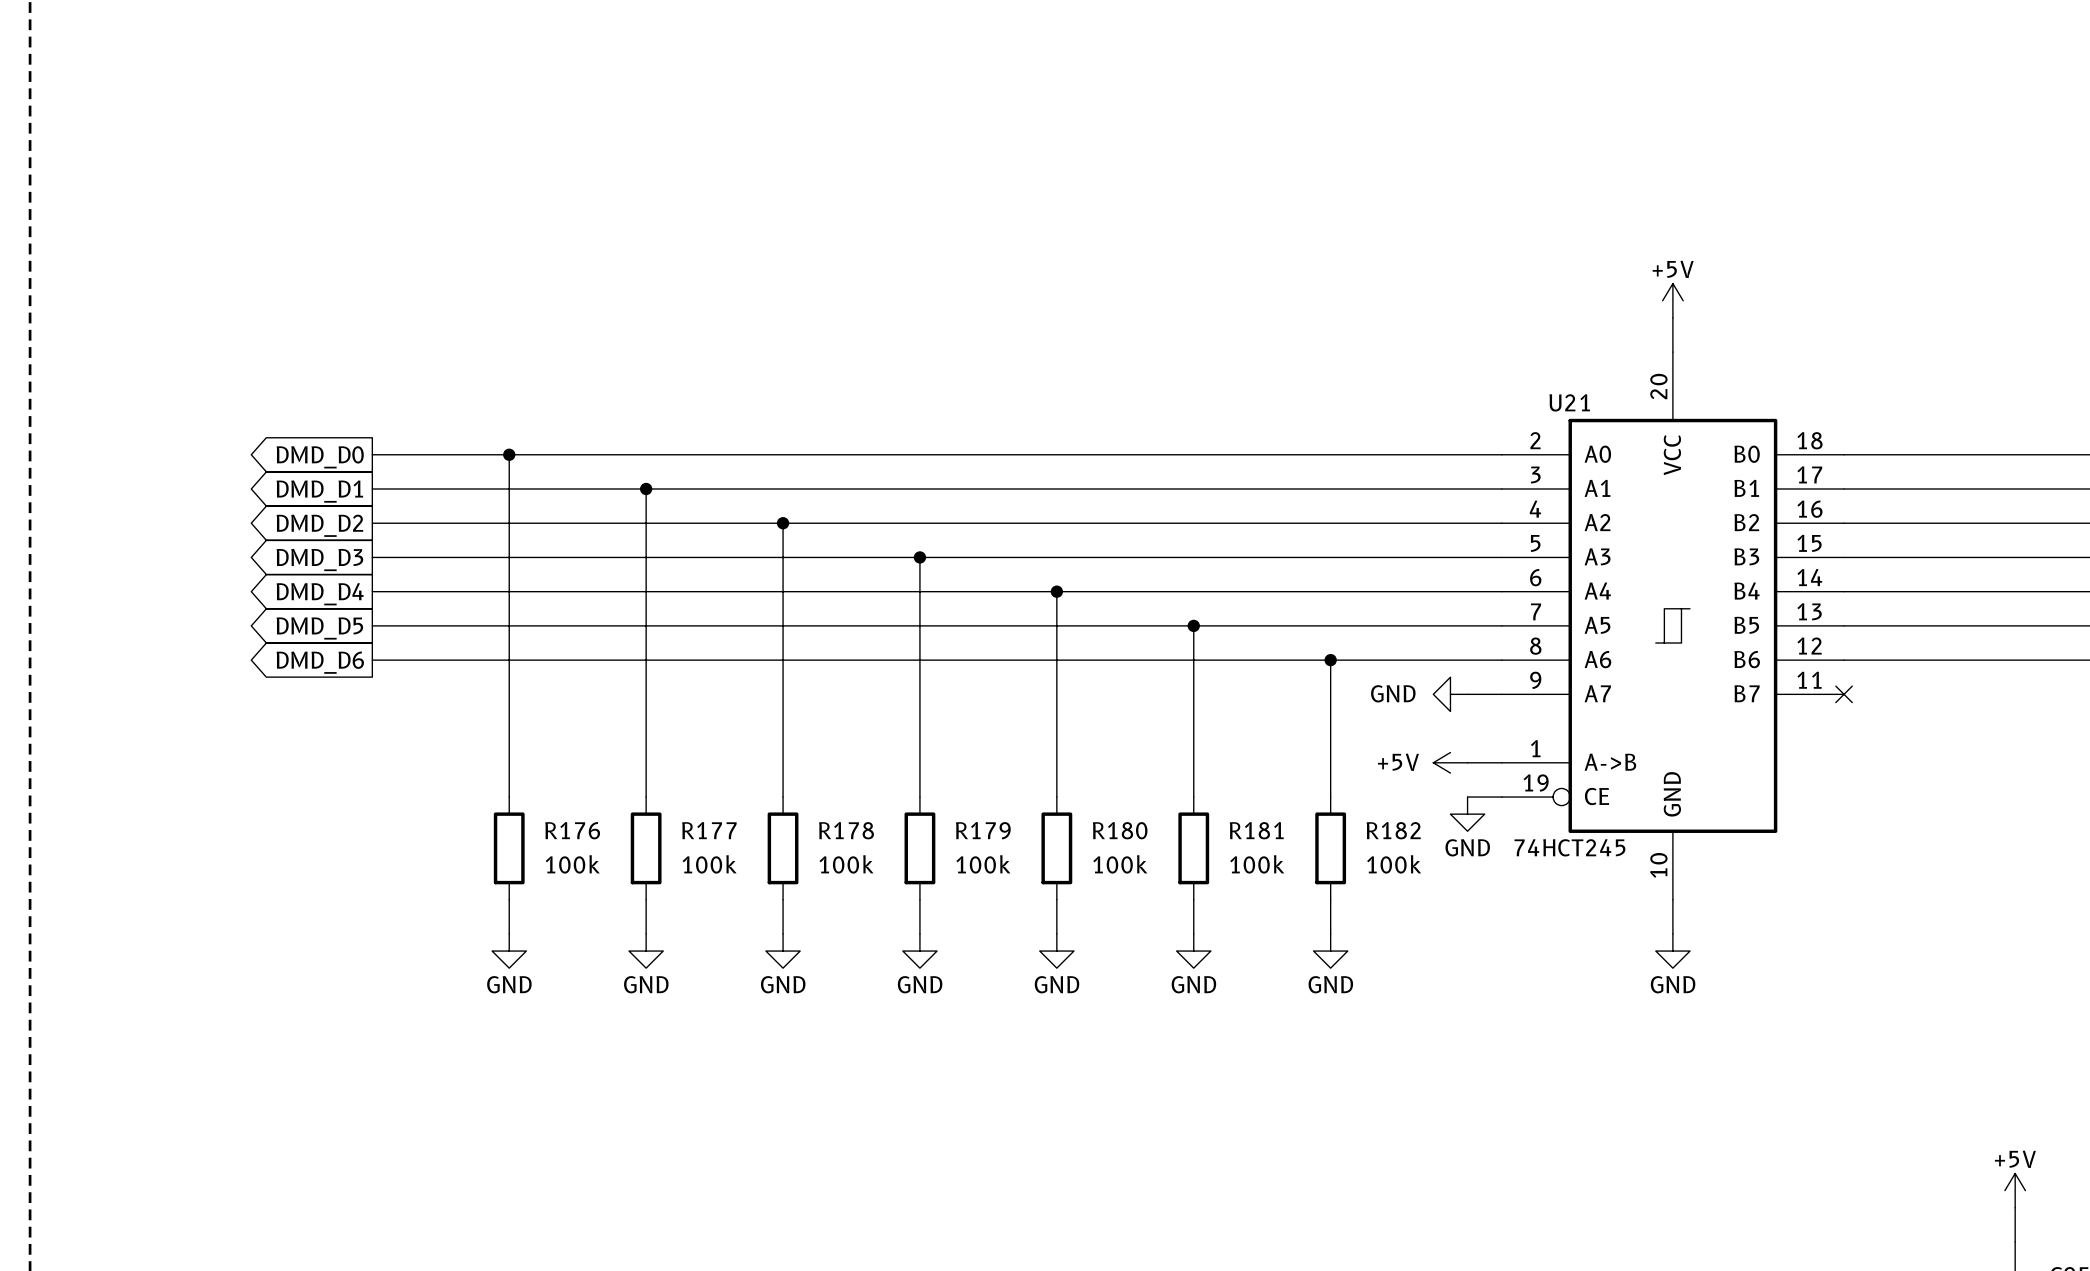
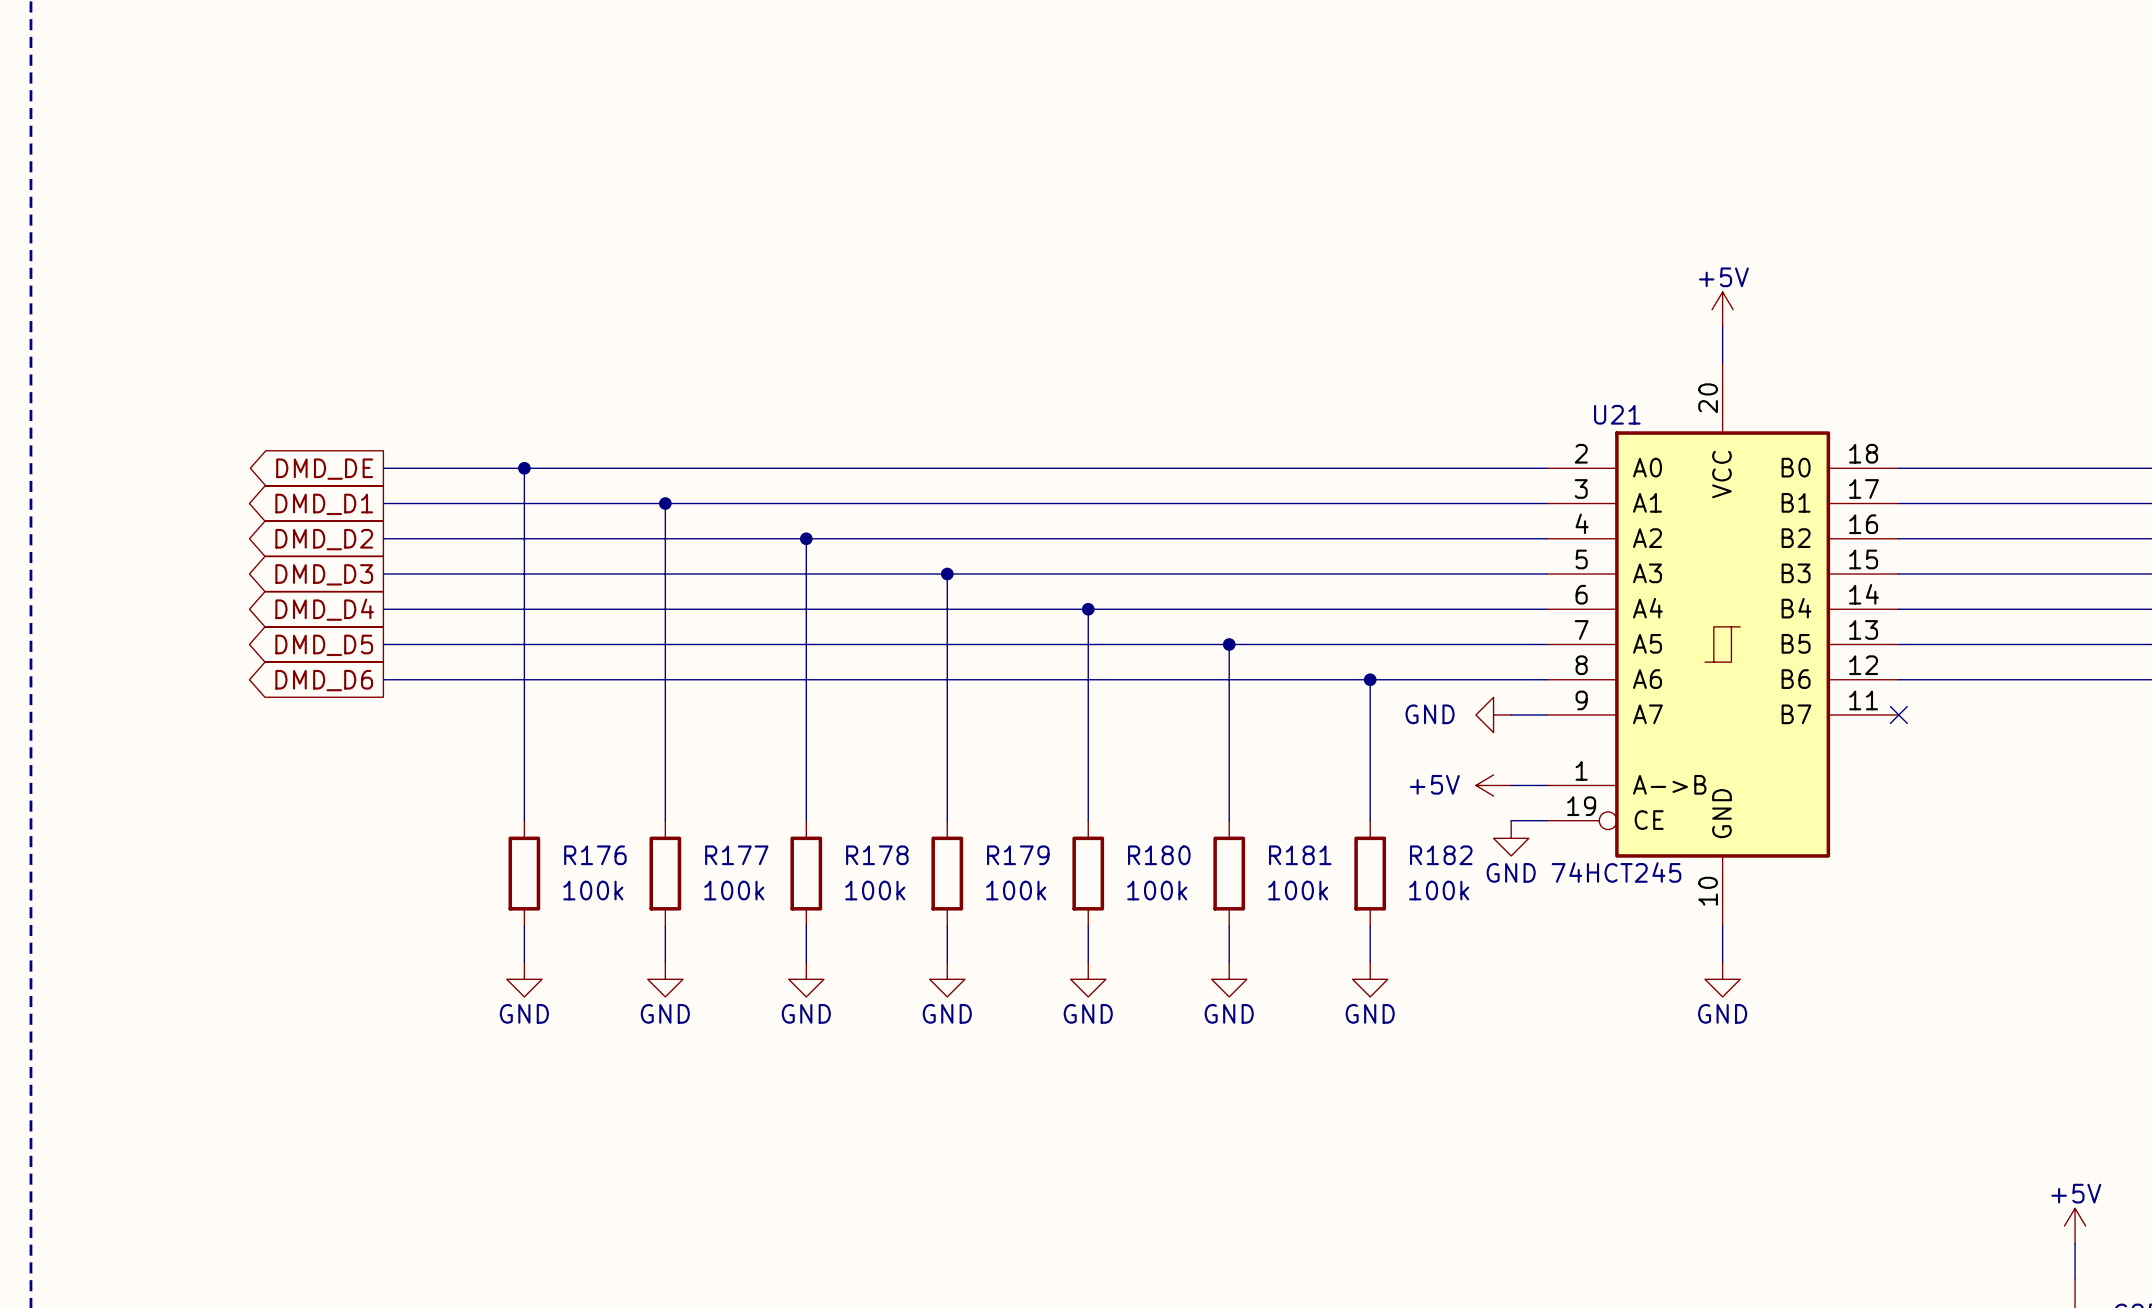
global label: DMD_D0 (320, 457) -> DMD_DE (324, 469)

